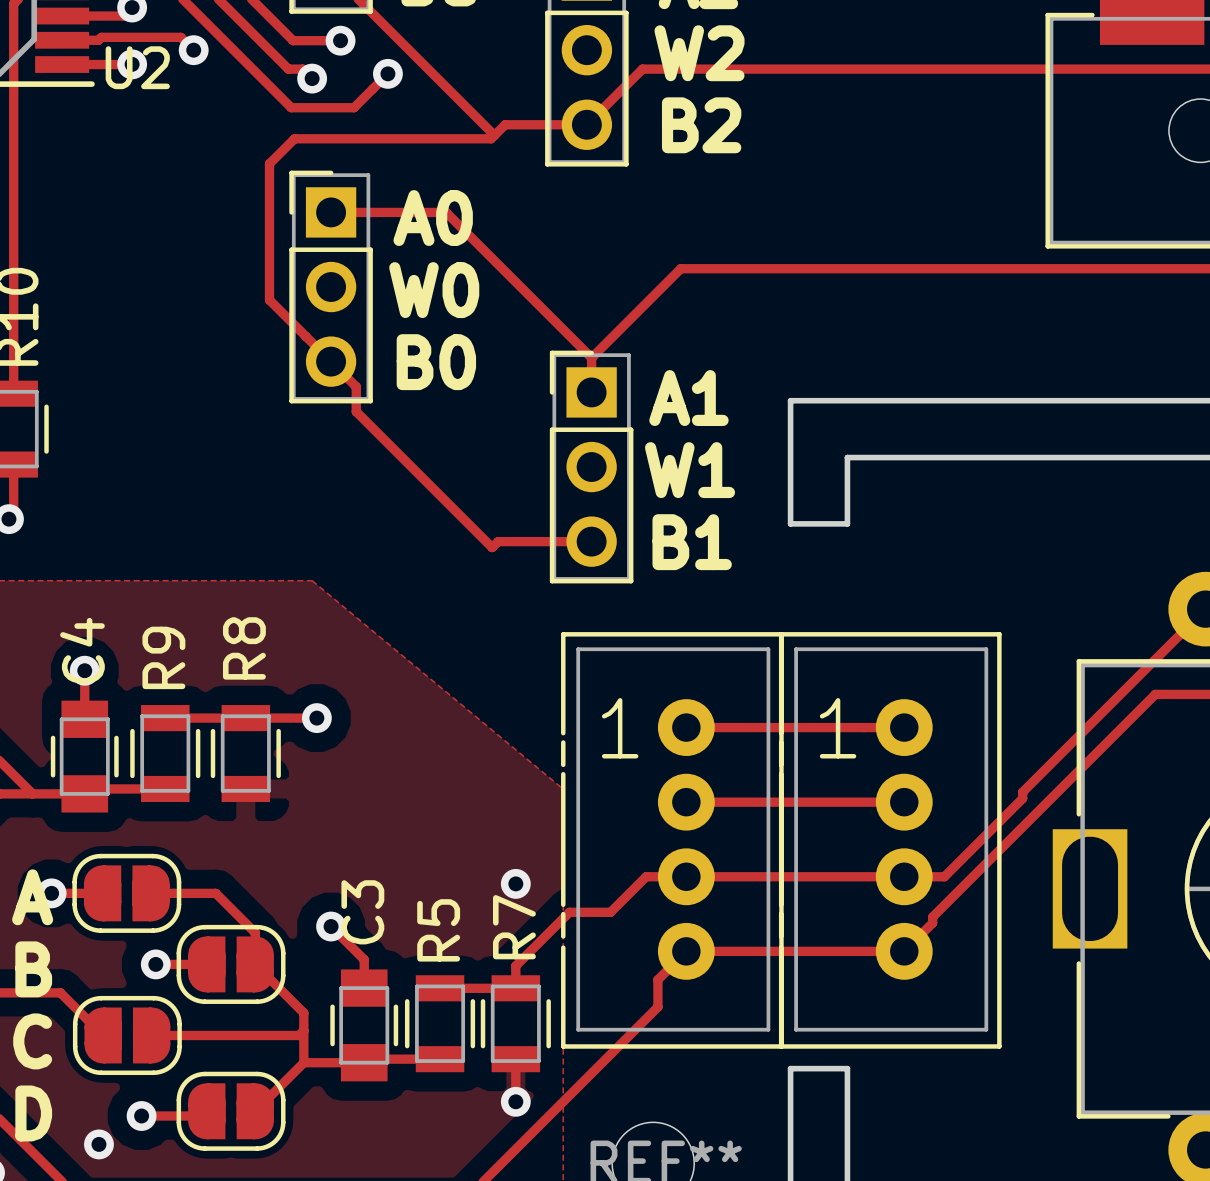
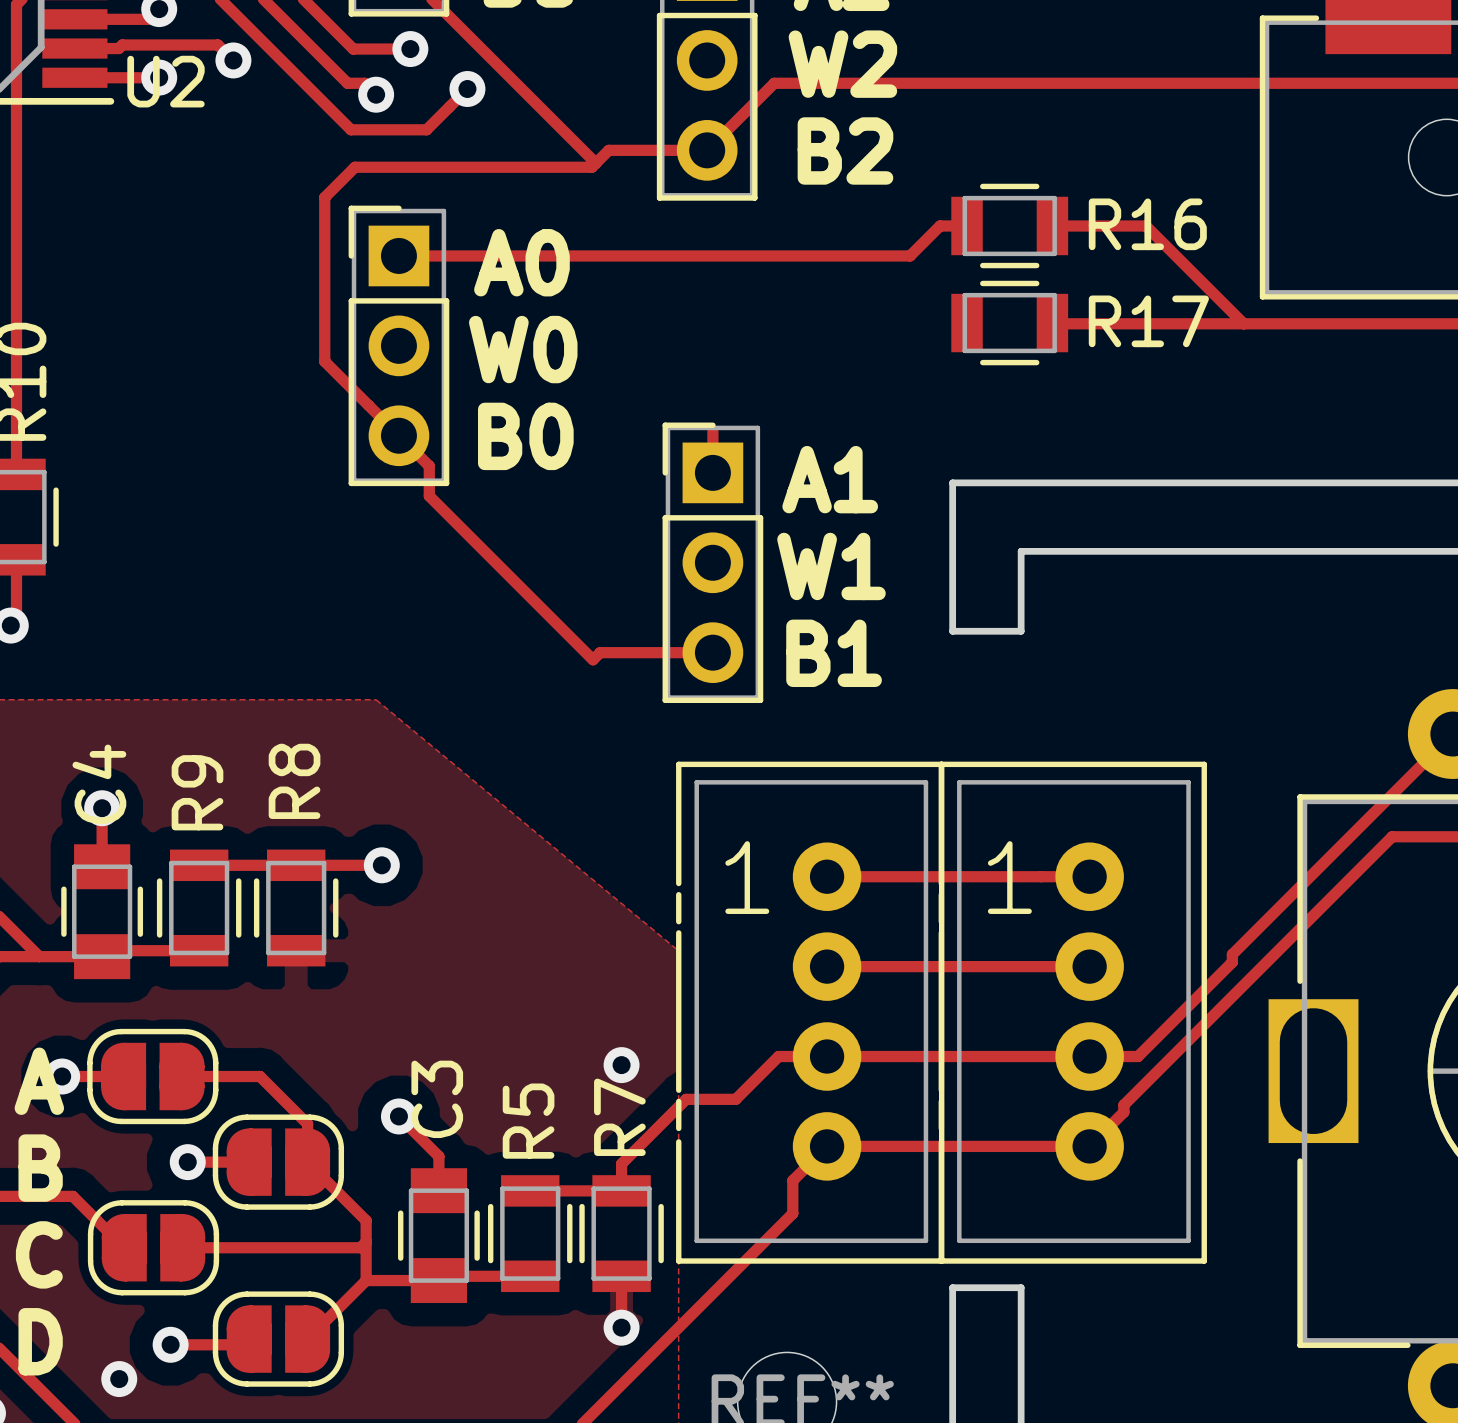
R16: none -> (1009, 225)
track: none -> (1052, 225) (1145, 225) (1243, 323)
track: (446, 212) (591, 357) (680, 268) (874, 268) -> (537, 255) (910, 255) (940, 225) (967, 225)
R17: none -> (1009, 323)

